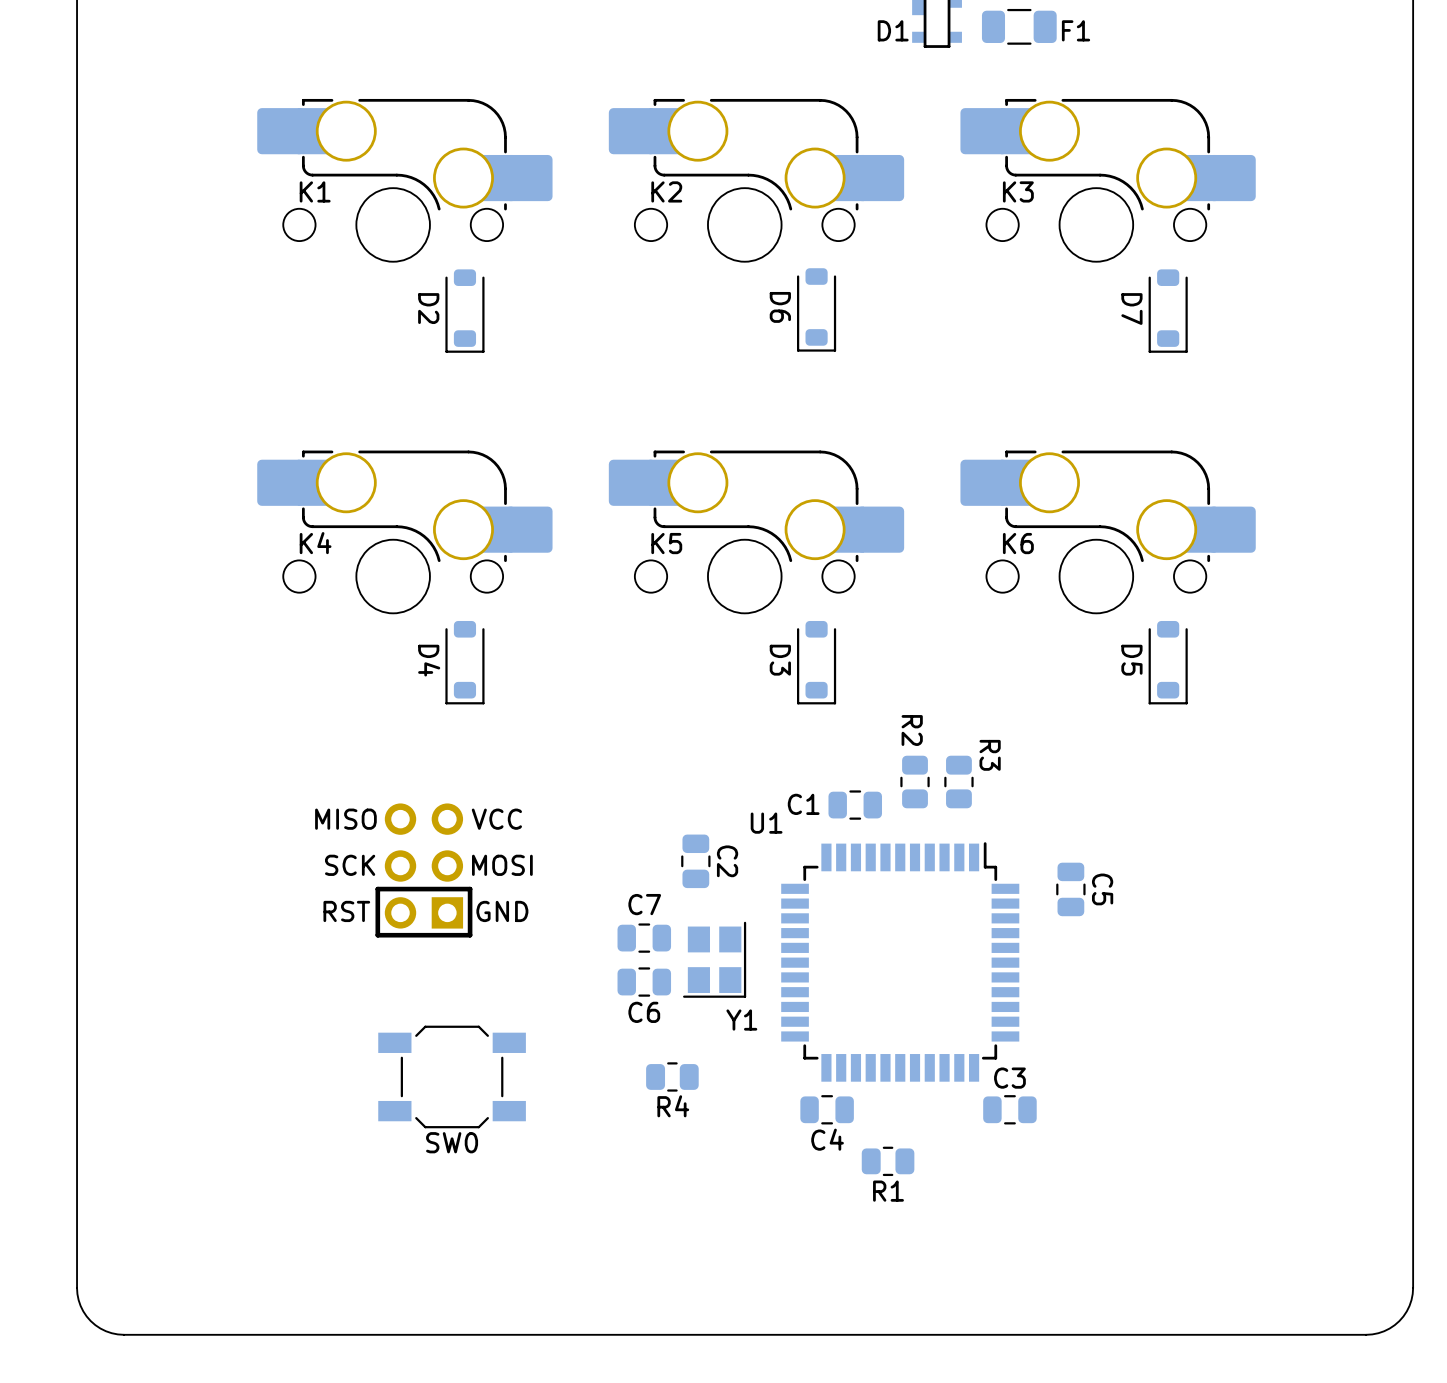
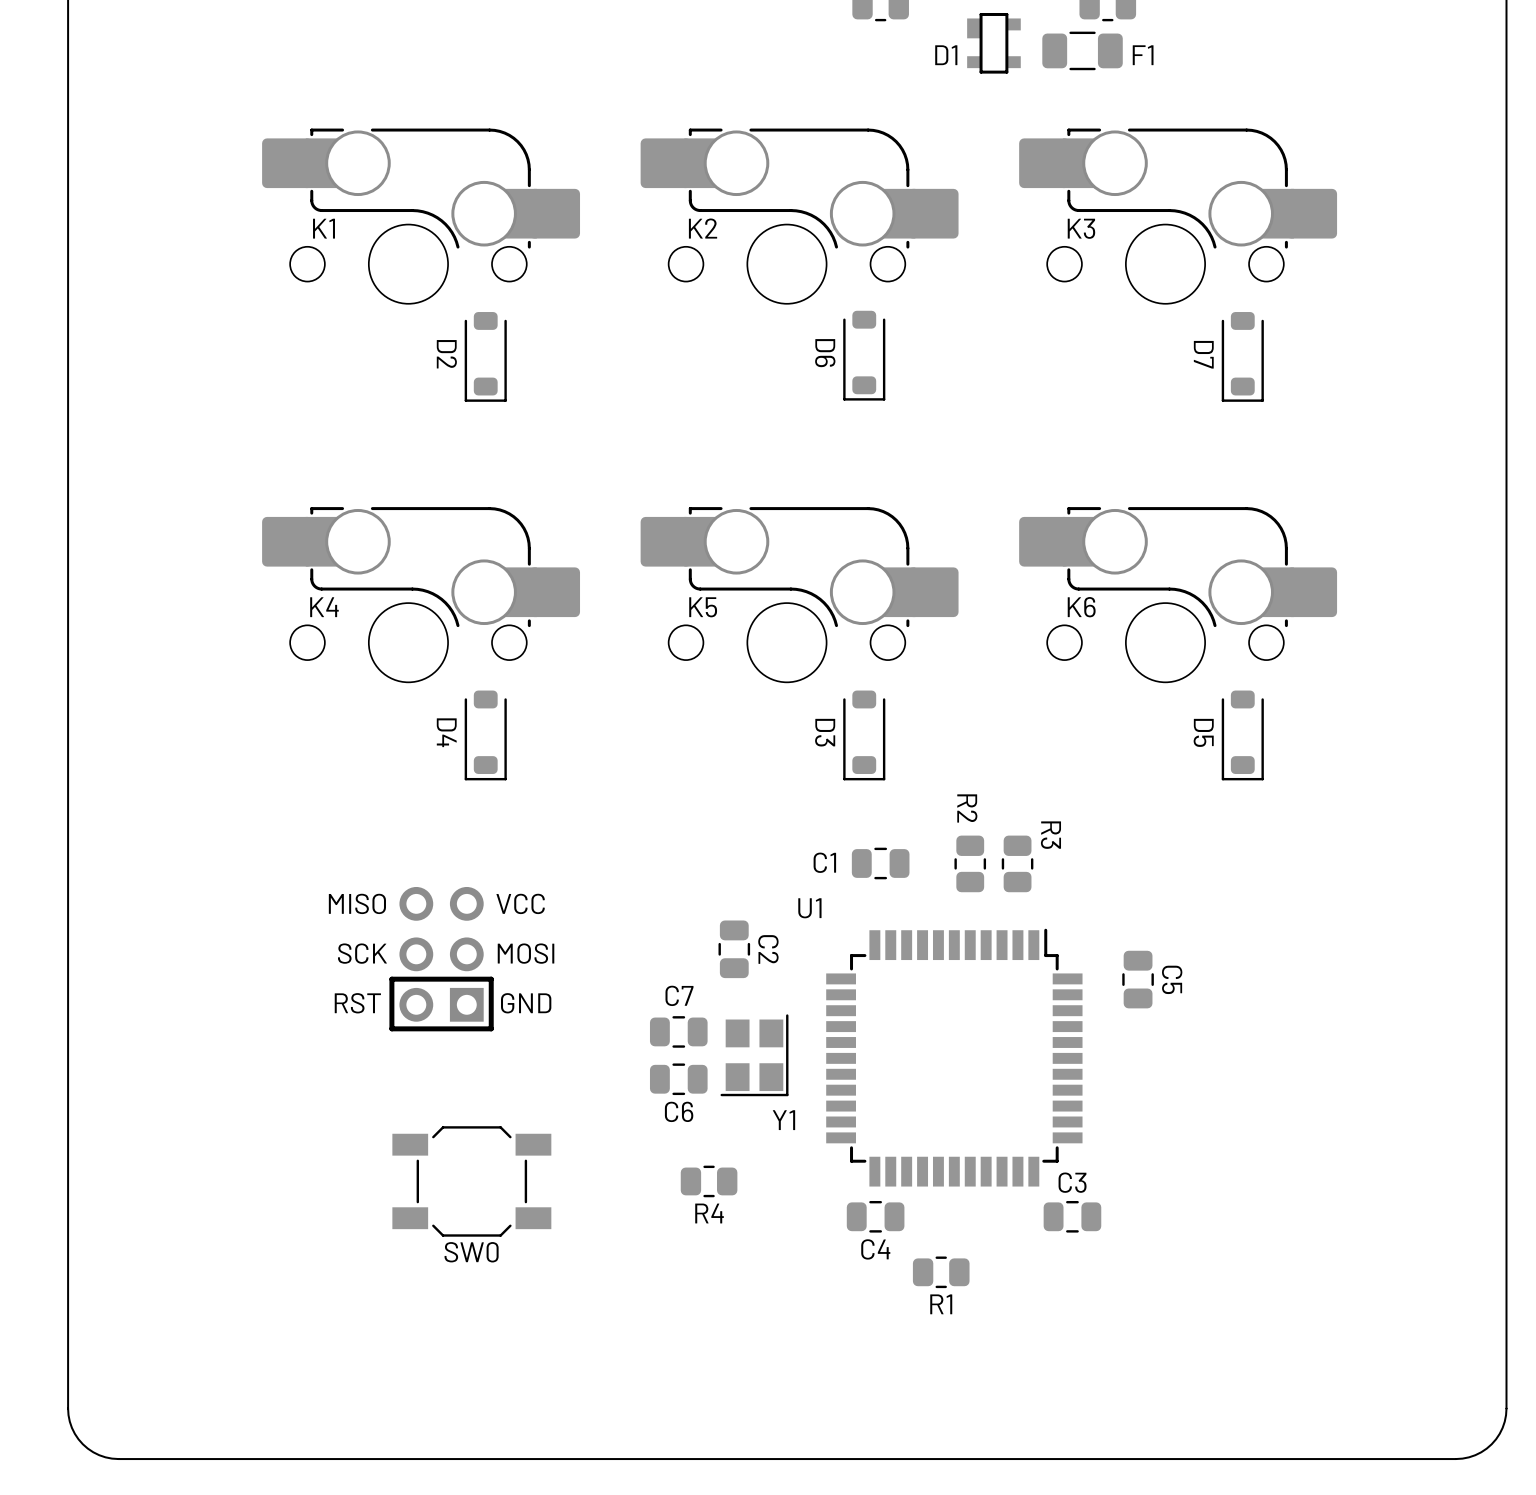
C1 position: (855, 805) -> (880, 863)

